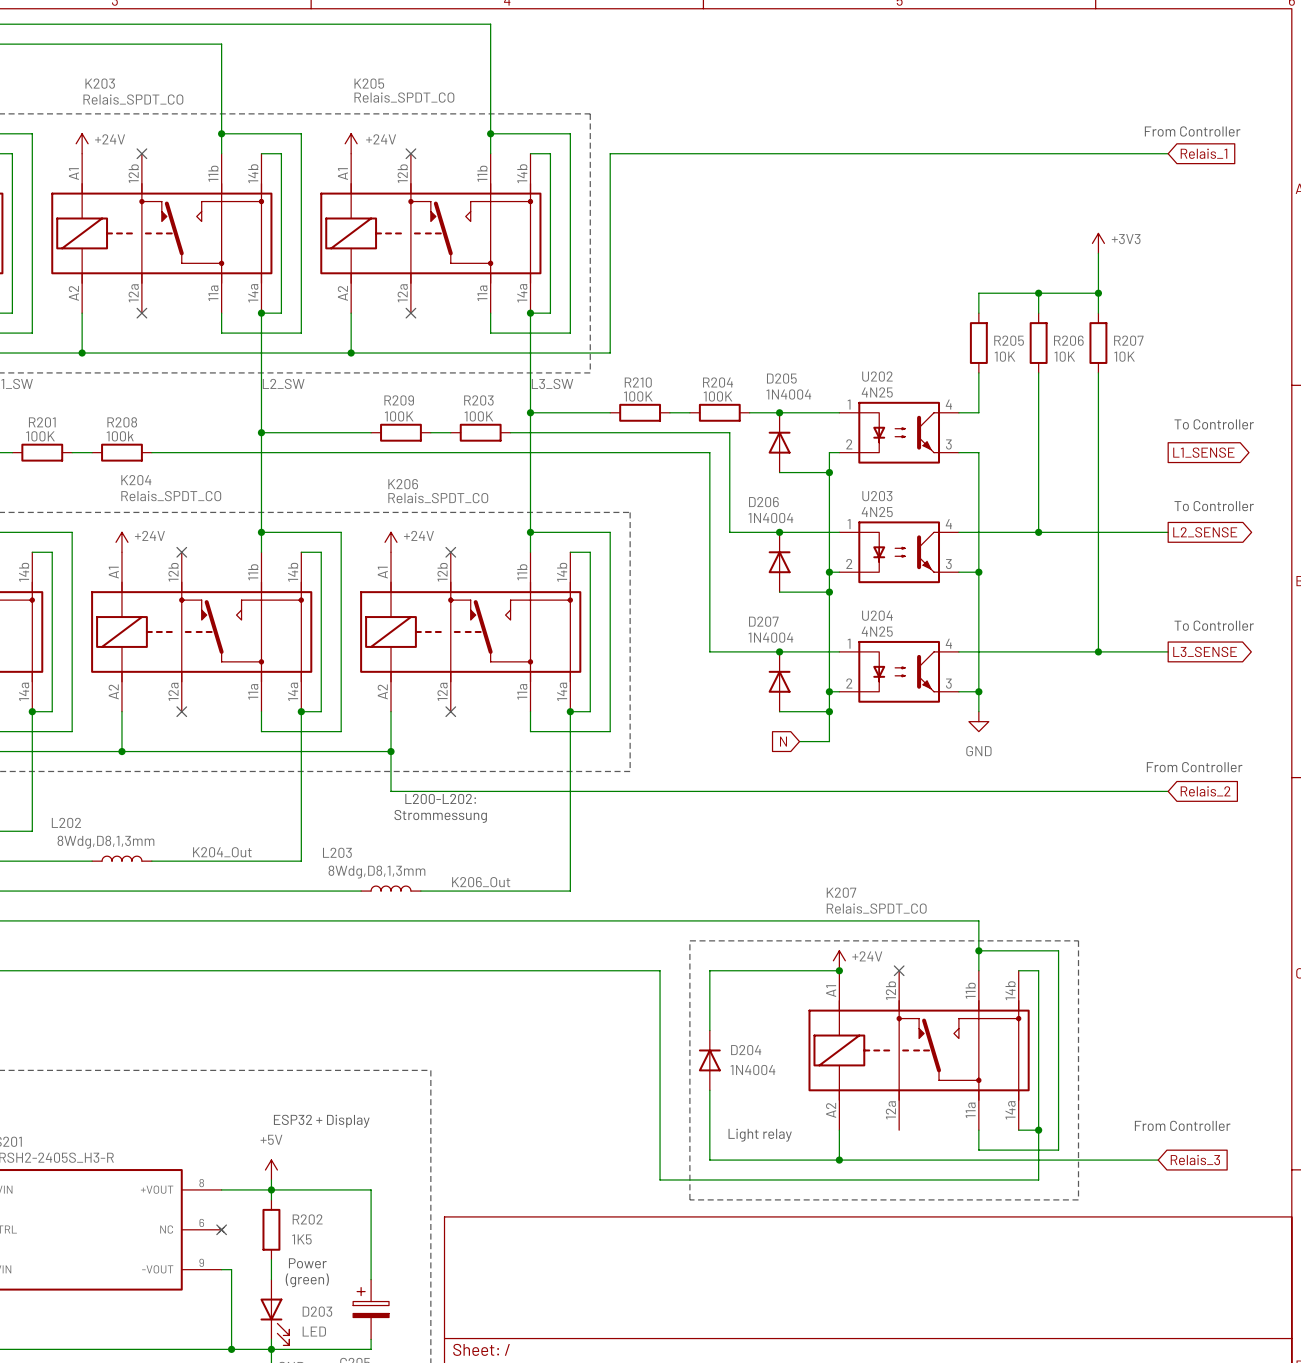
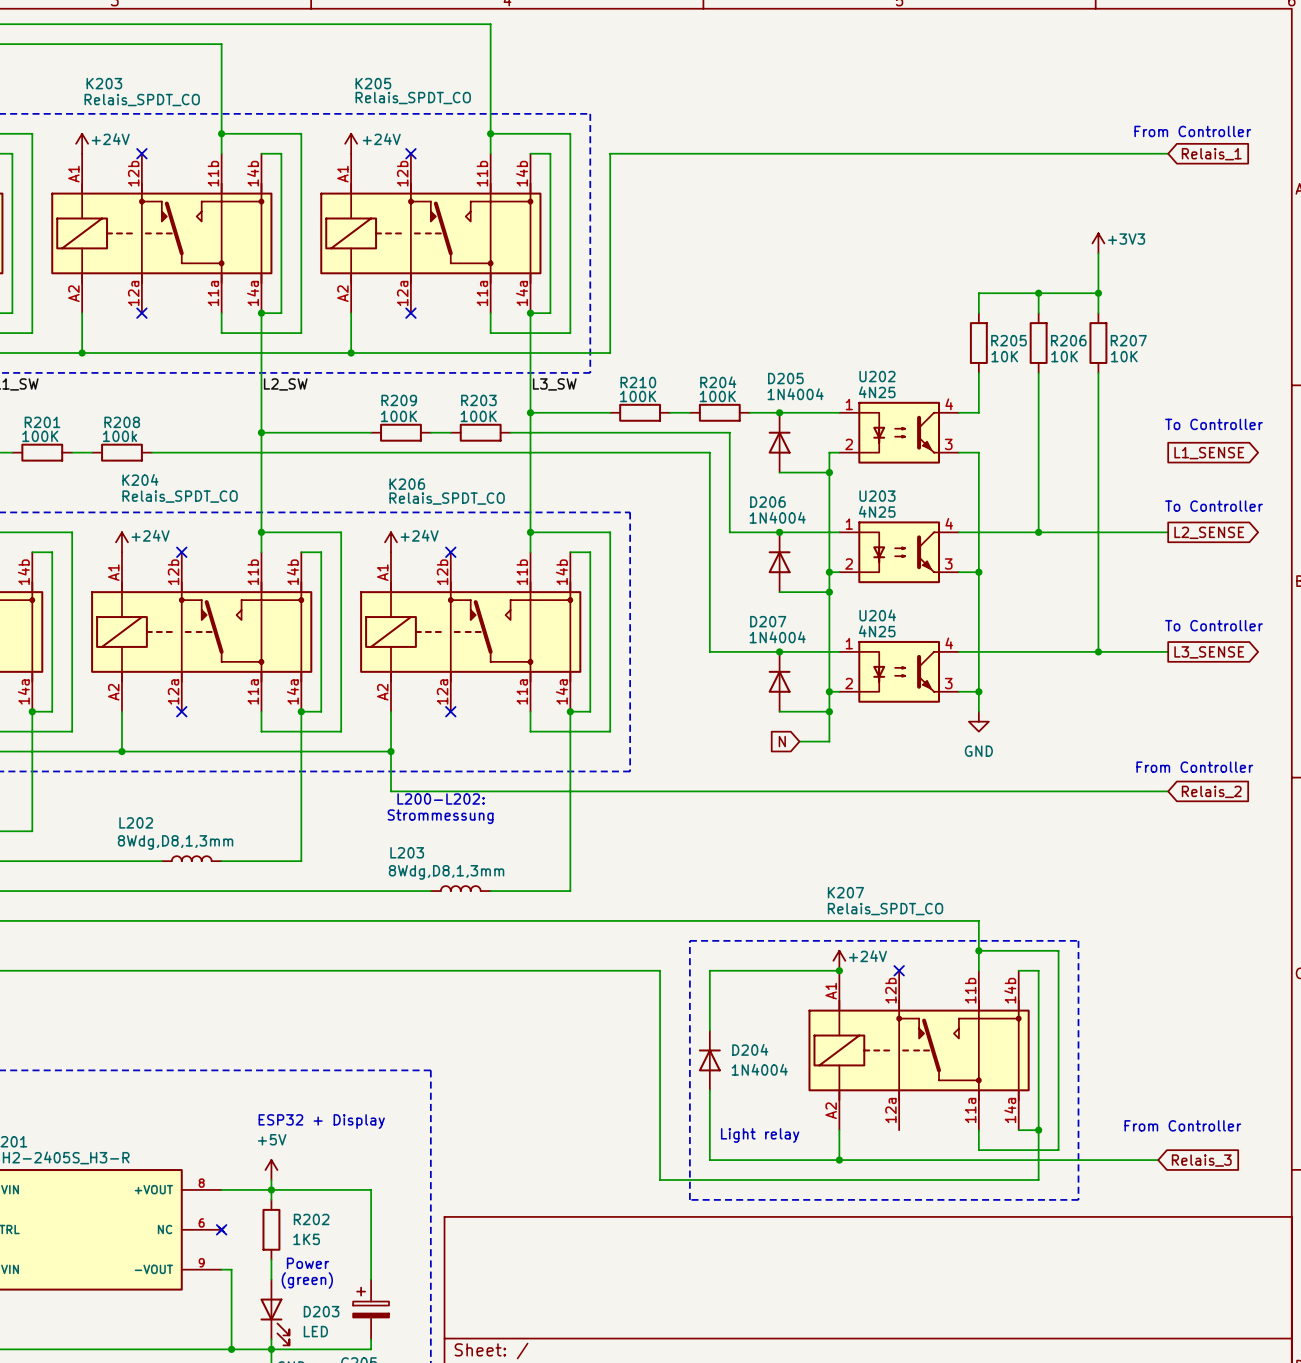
label: K204_Out (222, 852) -> none
L202 position: (121, 858) -> (191, 858)
wire: (161, 861) (221, 861) -> (92, 861) (151, 861)
label: K206_Out (481, 882) -> none
L203 position: (391, 888) -> (460, 888)
wire: (430, 891) (490, 891) -> (361, 891) (420, 891)

